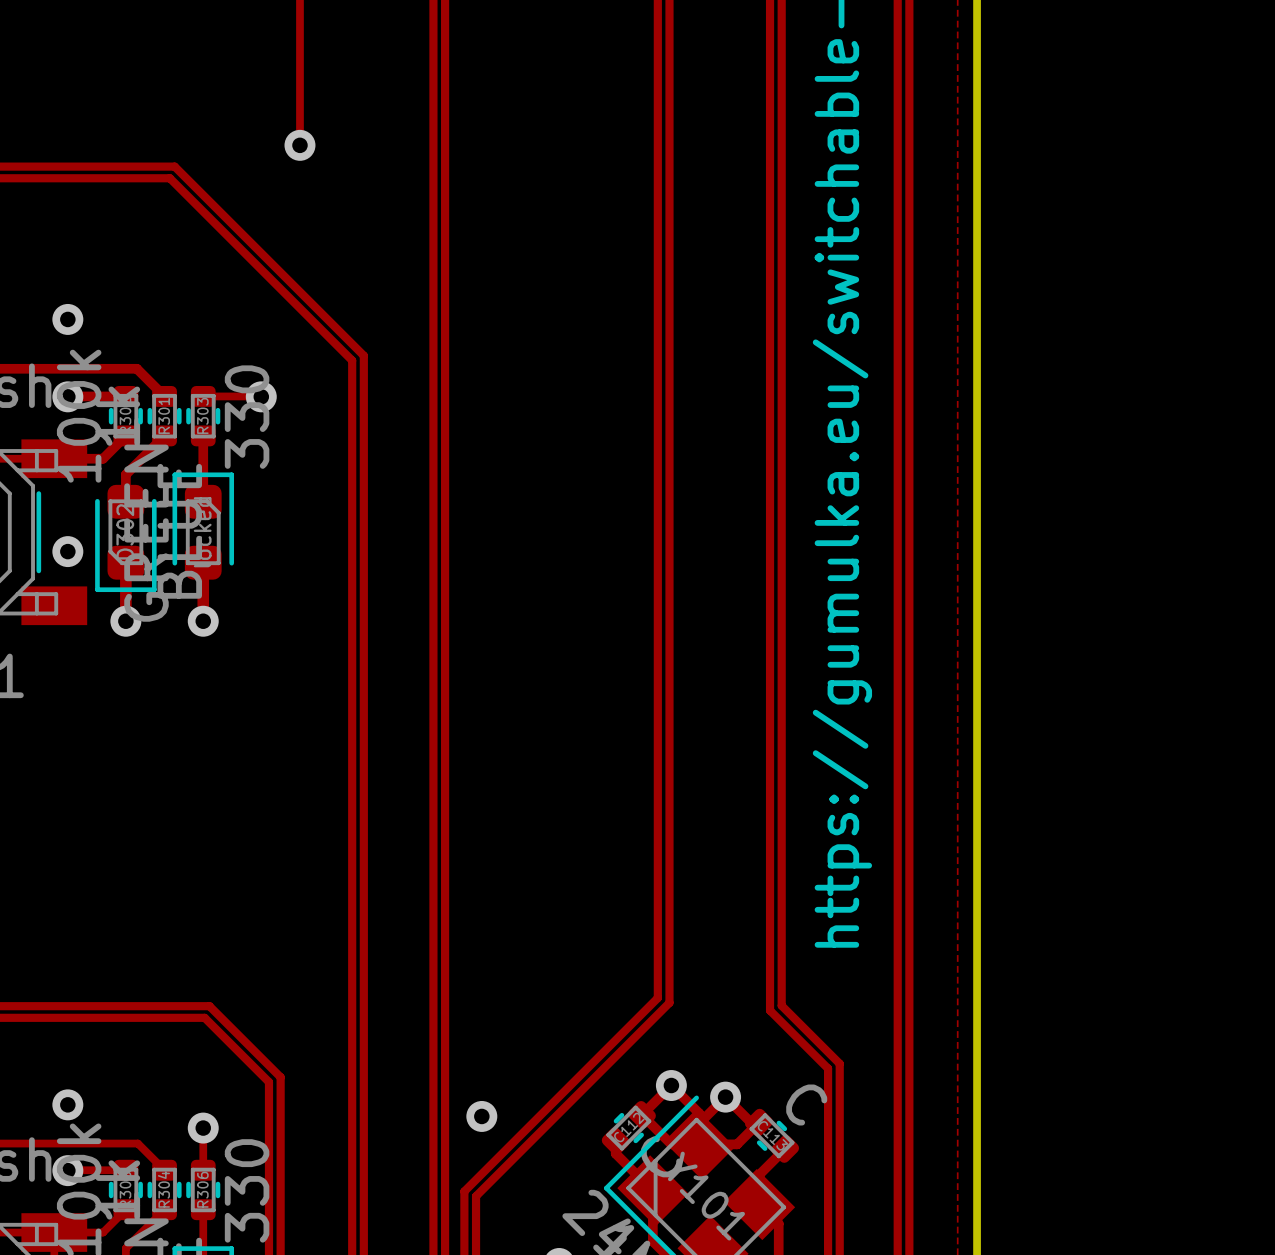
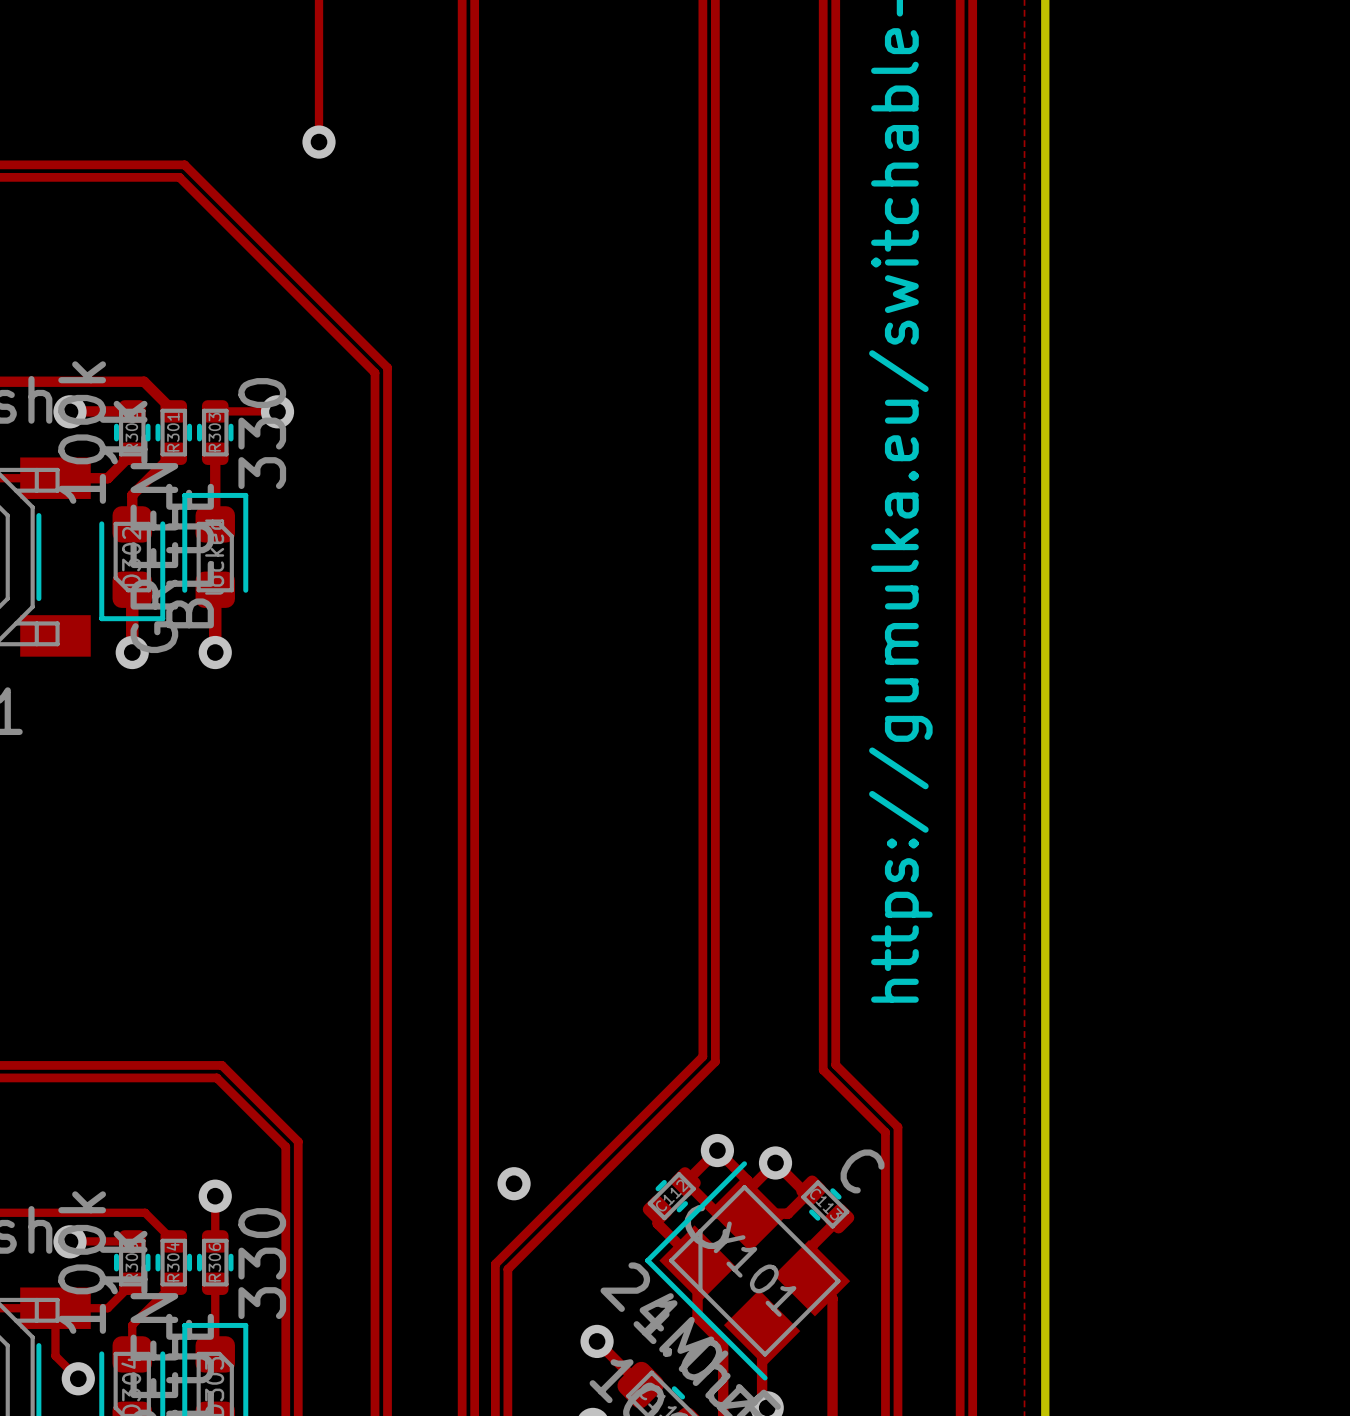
via: (67, 319) -> none
via: (67, 551) -> none
via: (67, 1104) -> none

